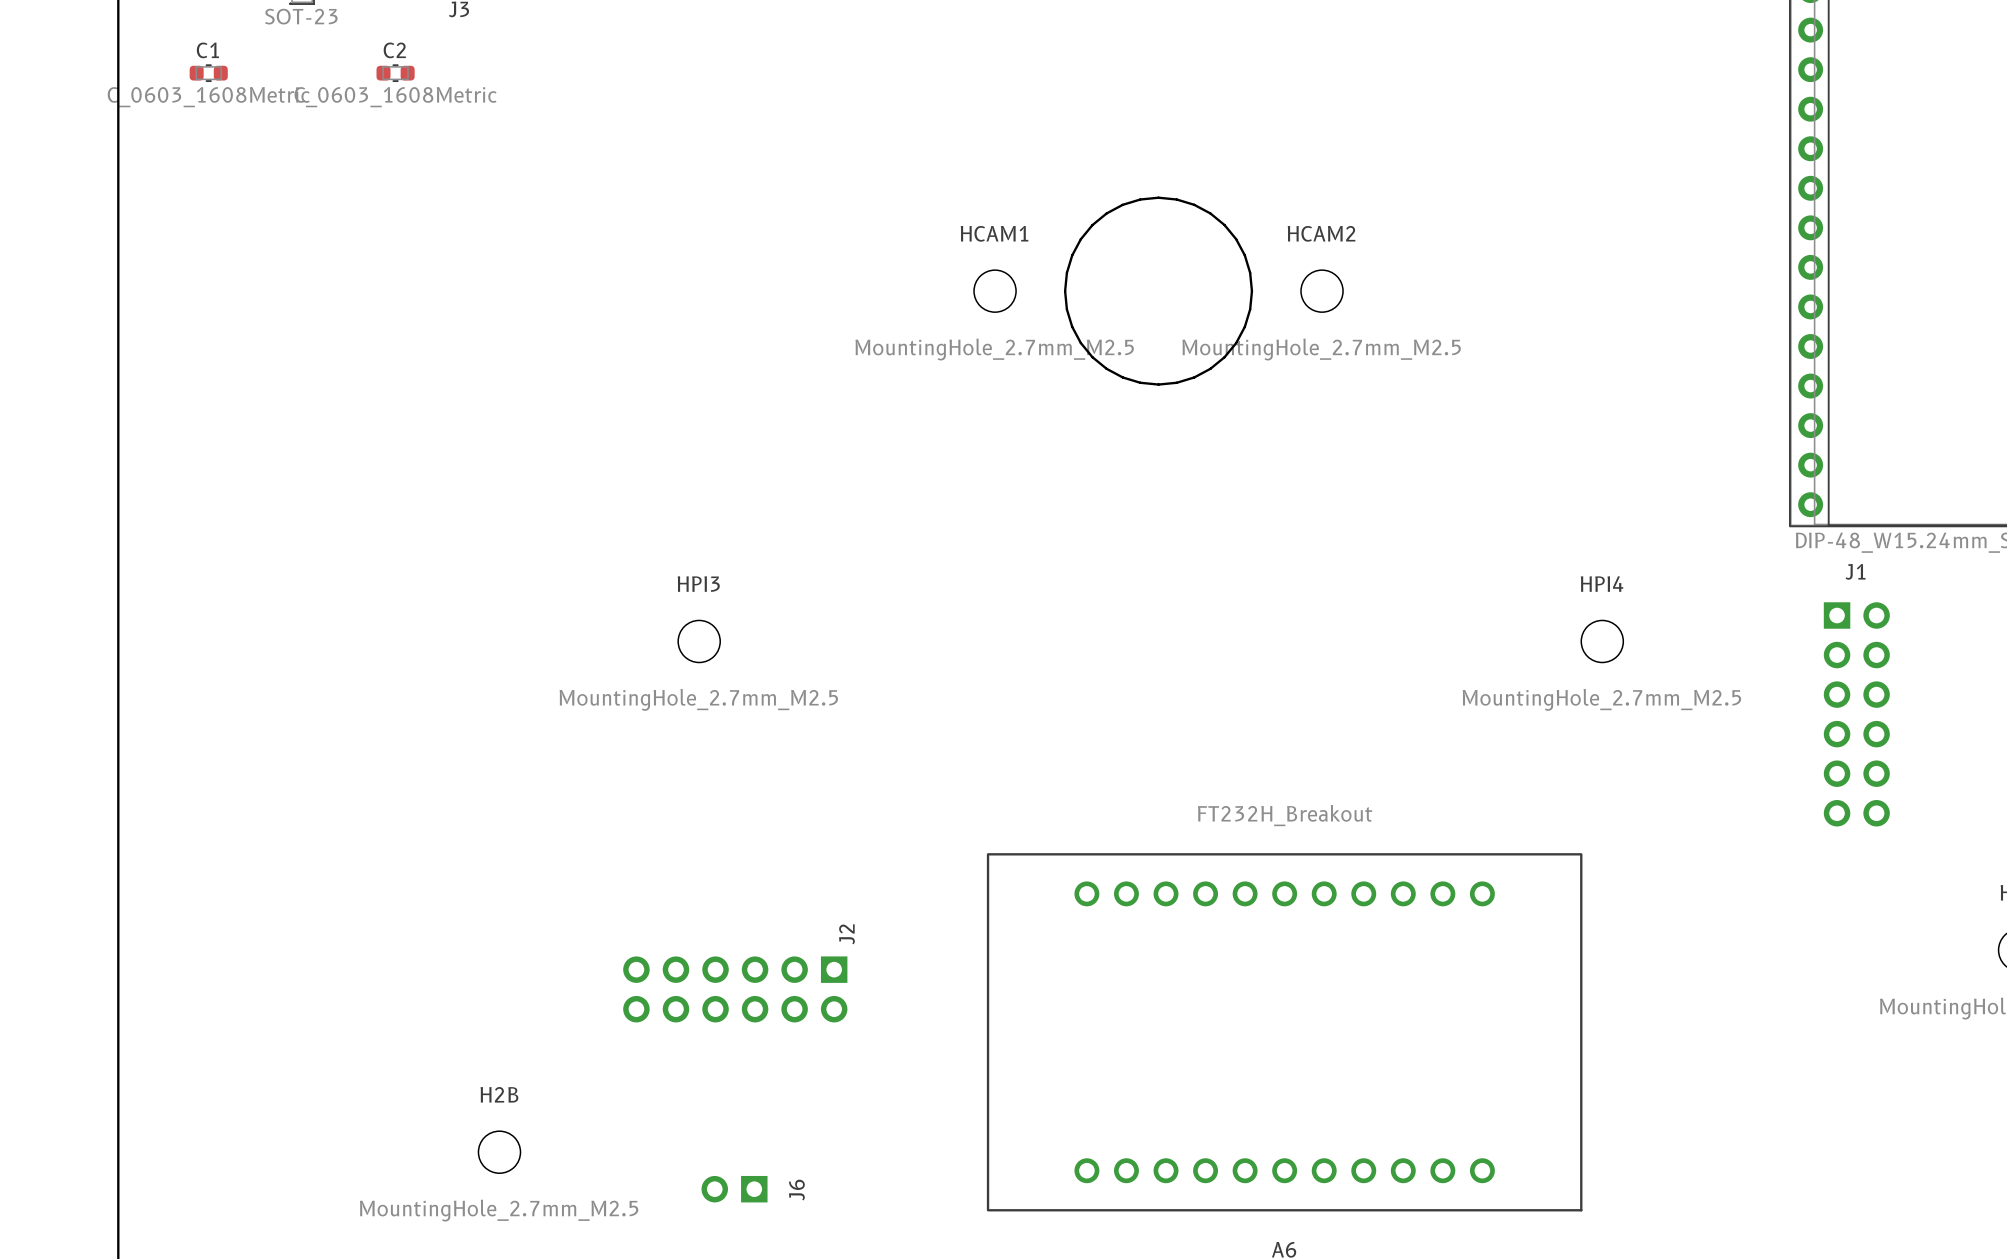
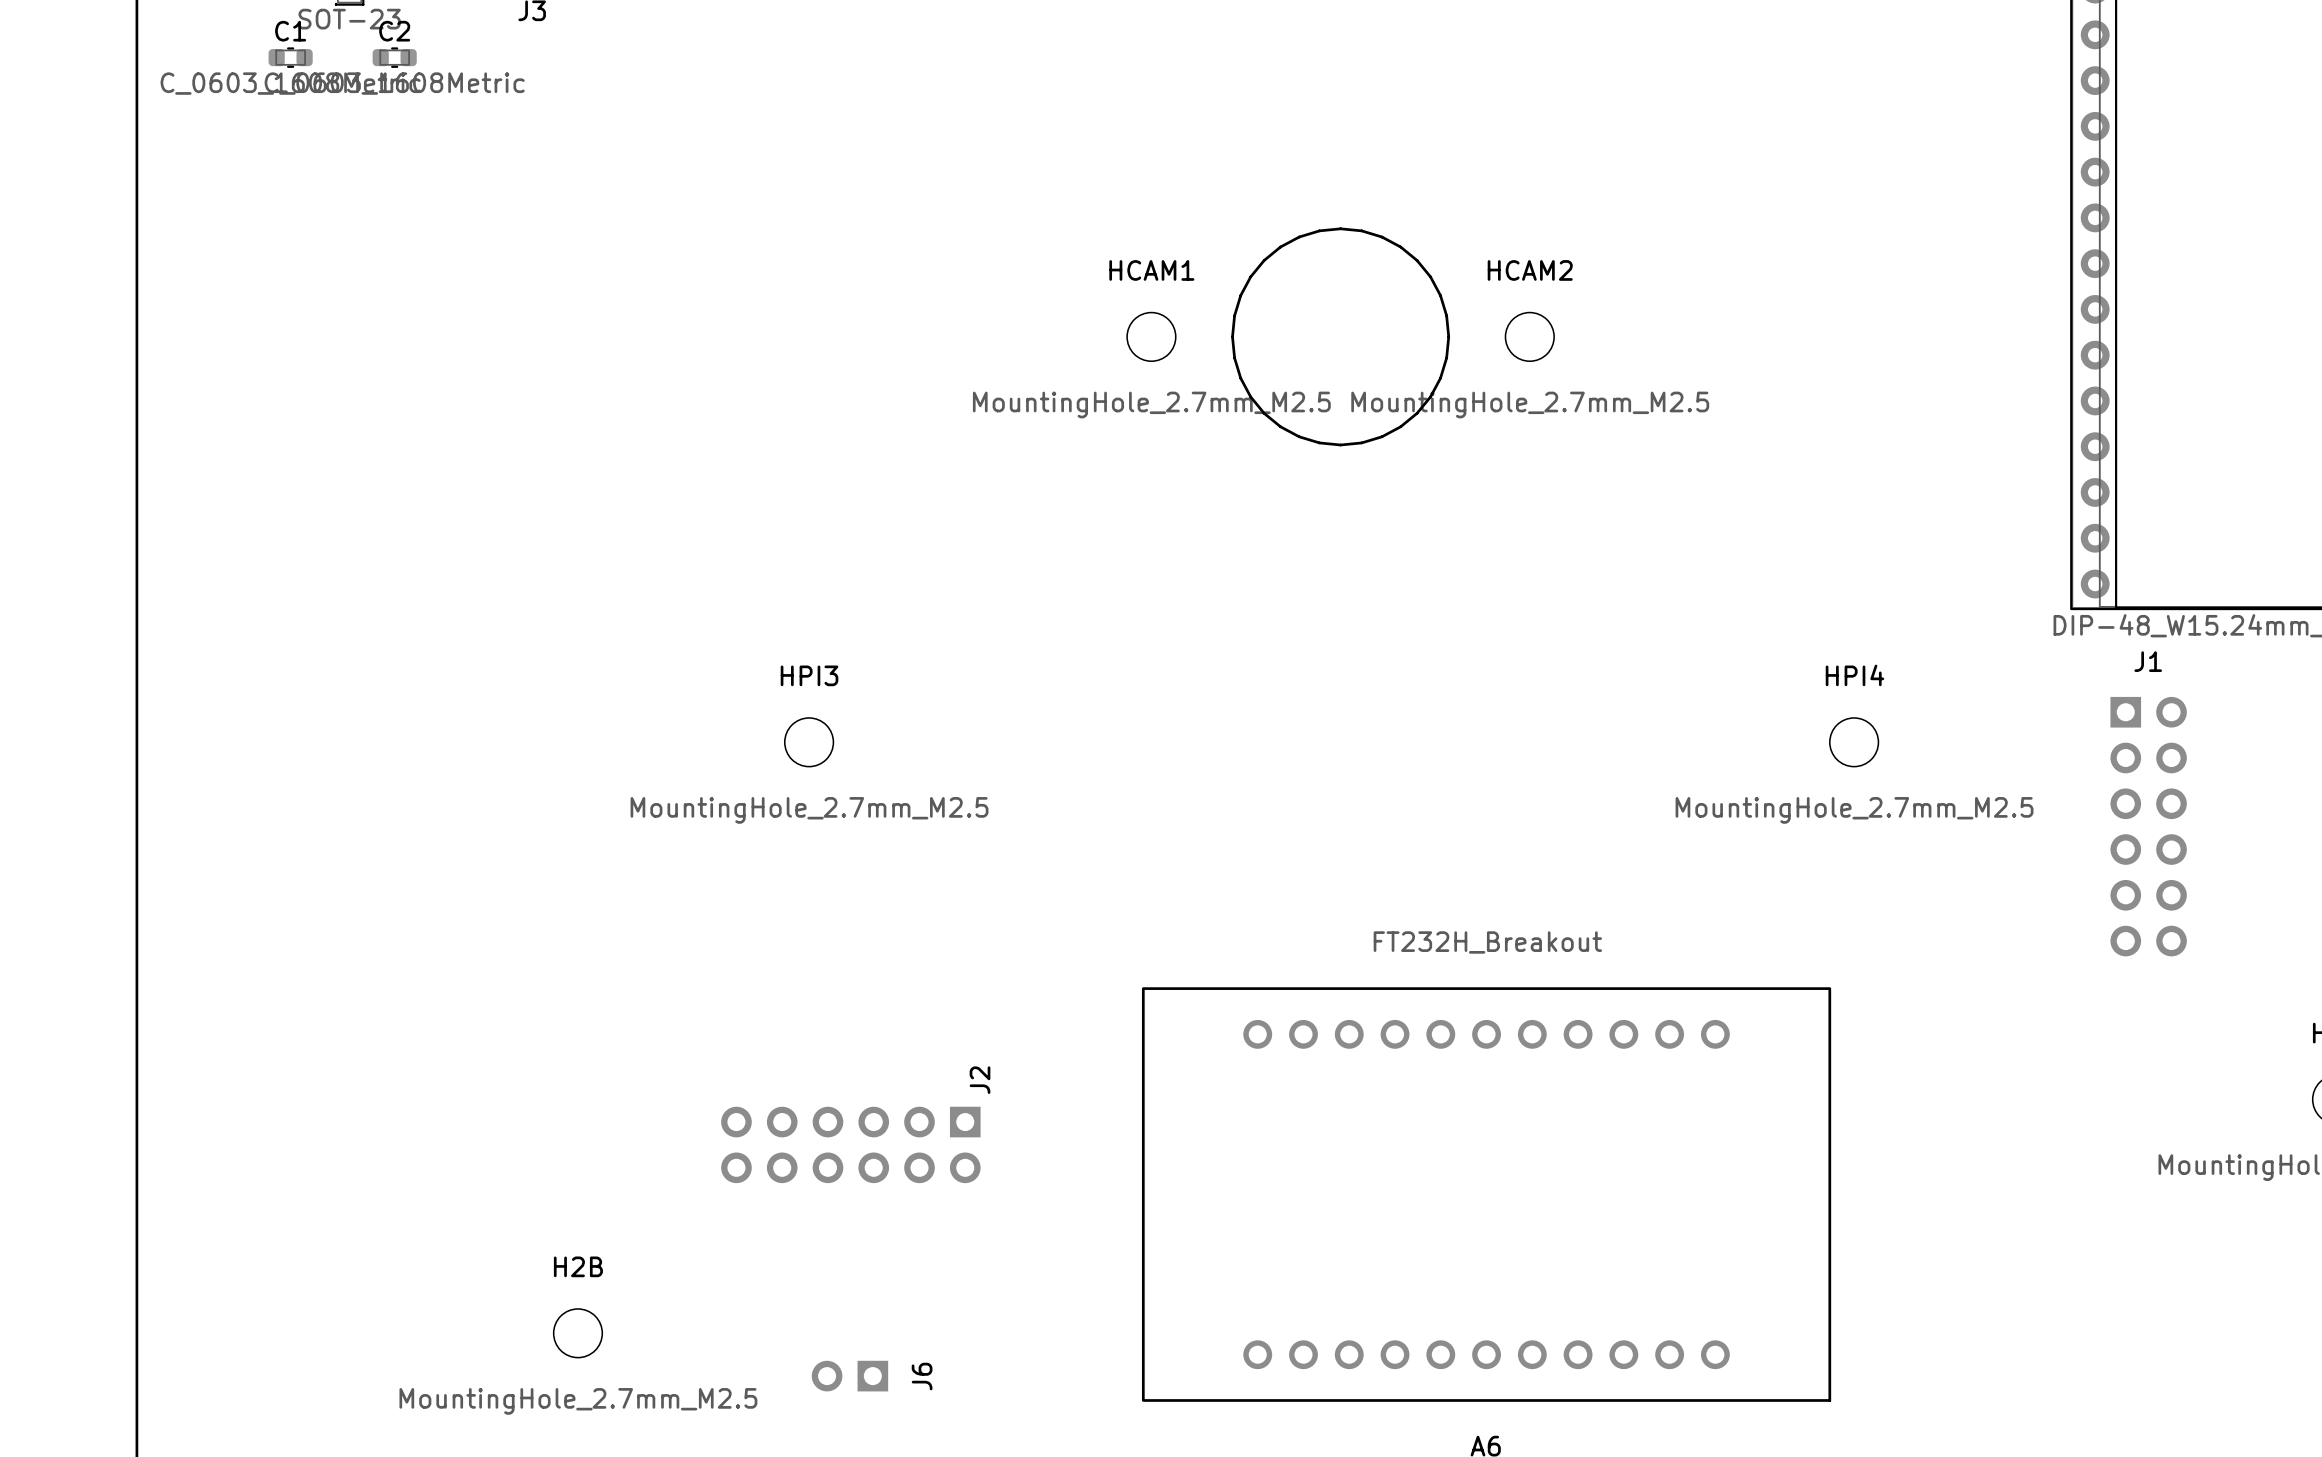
C1 position: (208, 73) -> (290, 57)
C2 position: (395, 73) -> (394, 57)

